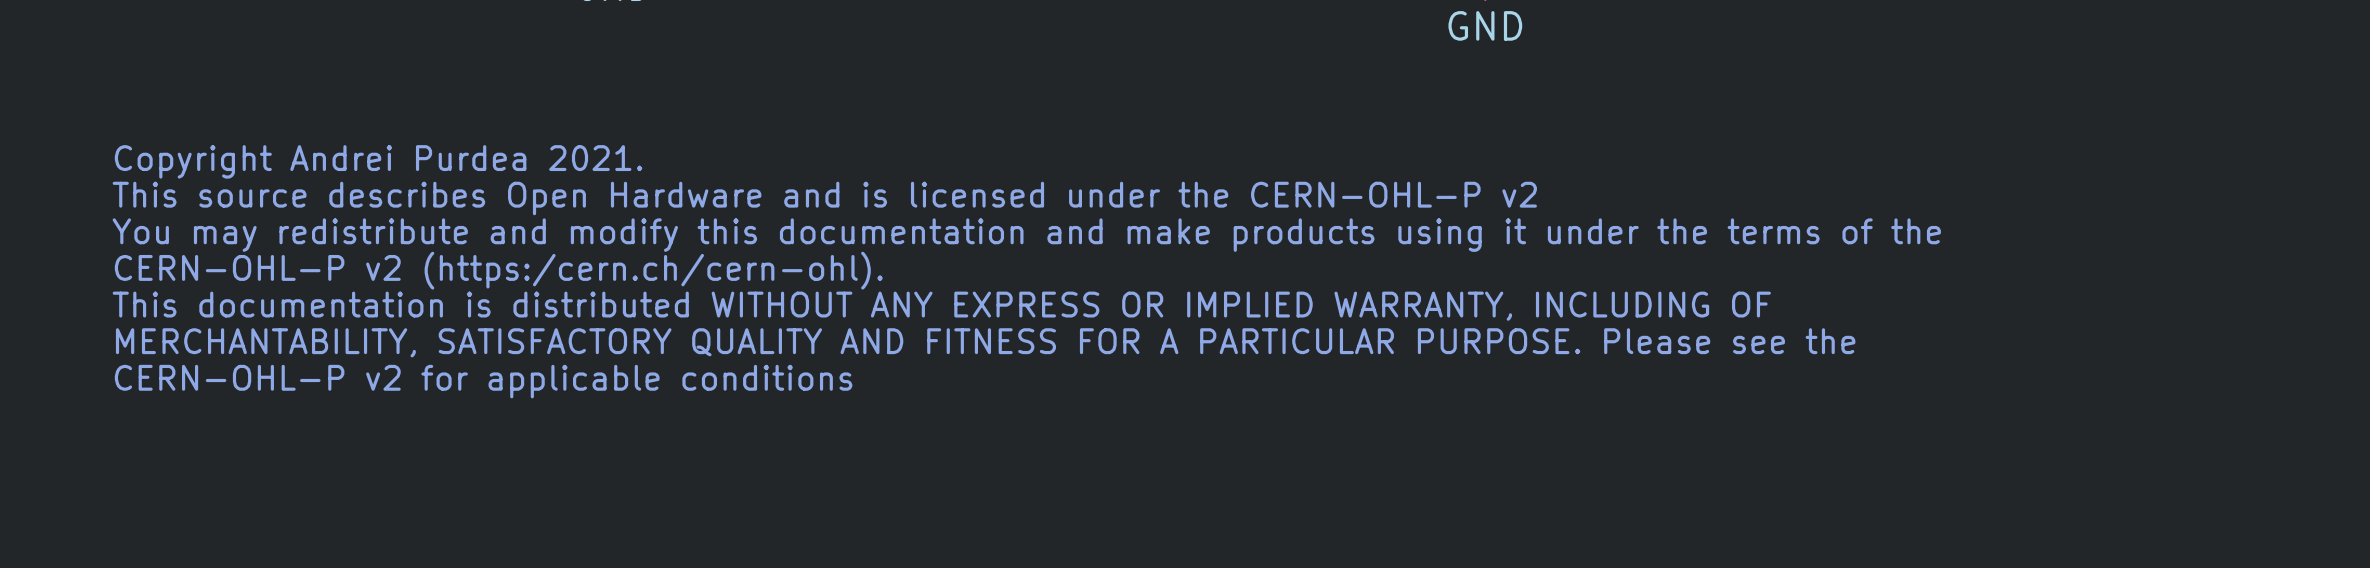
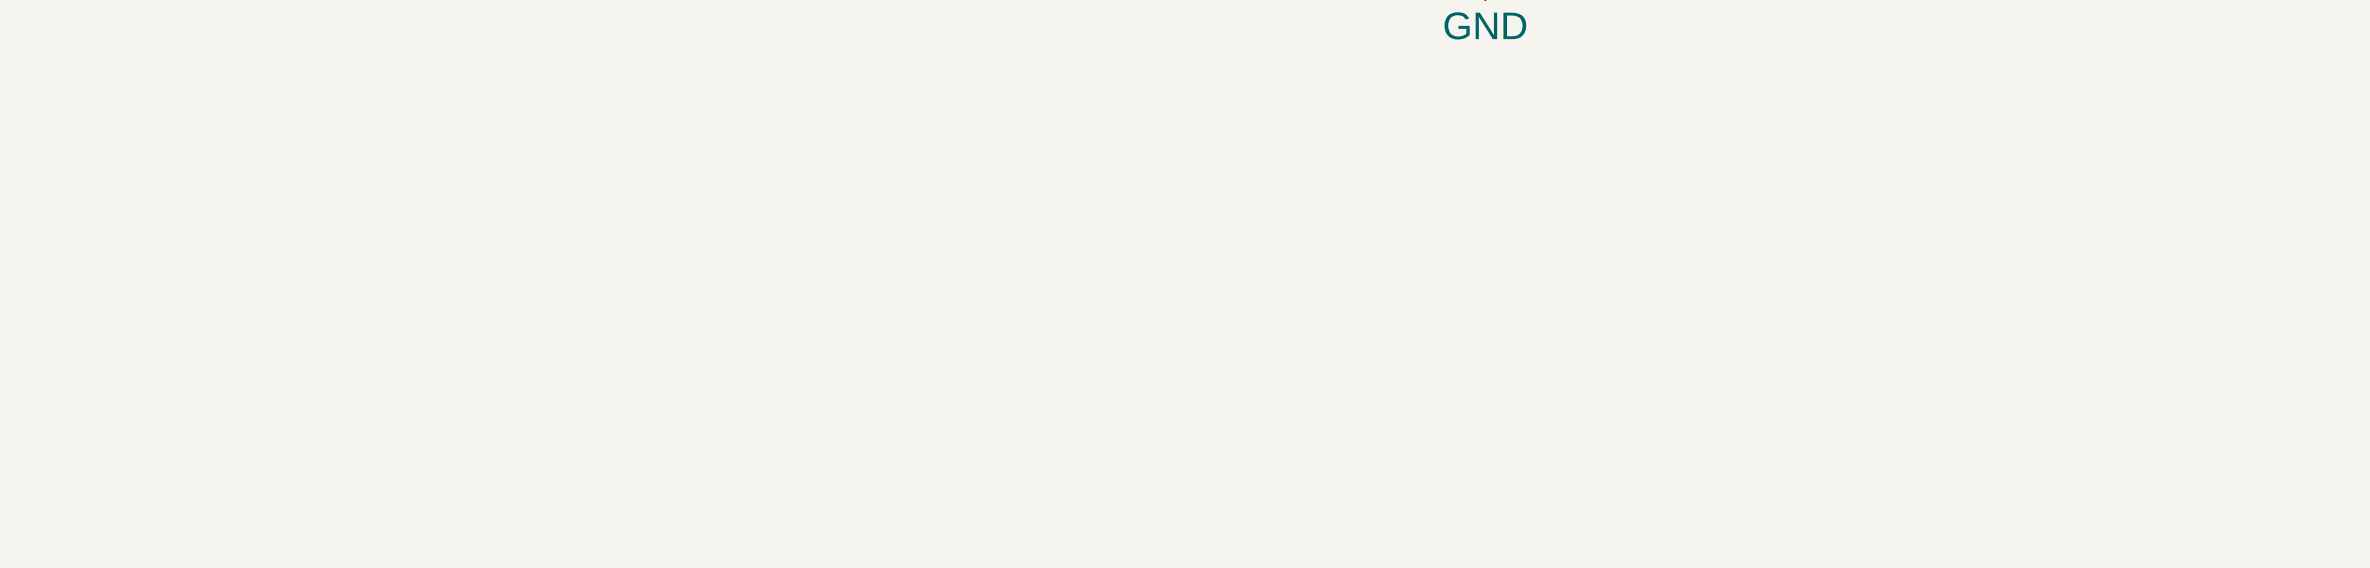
text: Copyright Andrei Purdea 2021. (378, 161) -> none
text: This source describes Open Hardware and is licensed under the CERN-OHL-P v2 (824, 198) -> none
text: You may redistribute and modify this documentation and make products using it under the terms of the (1026, 235) -> none
text: CERN-OHL-P v2 (https:/cern.ch/cern-ohl). (498, 270) -> none
text: This documentation is distributed WITHOUT ANY EXPRESS OR IMPLIED WARRANTY, INCLUDING OF (941, 306) -> none
text: MERCHANTABILITY, SATISFACTORY QUALITY AND FITNESS FOR A PARTICULAR PURPOSE. Please see the (985, 342) -> none
text: CERN-OHL-P v2 for applicable conditions (483, 381) -> none

